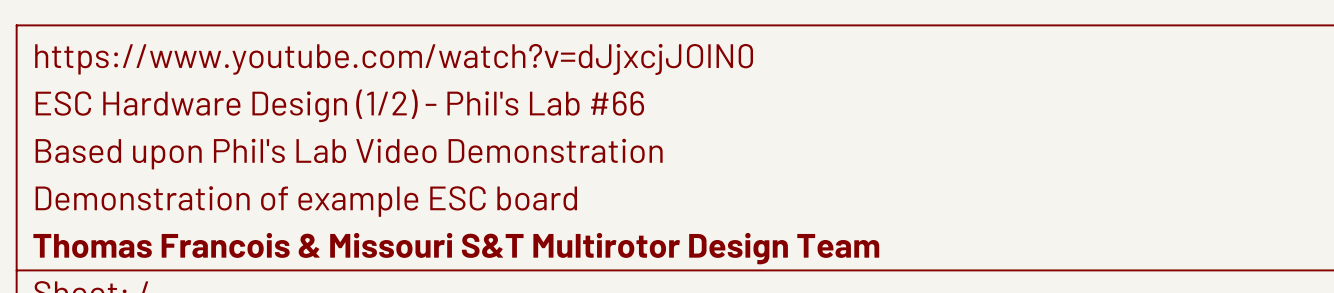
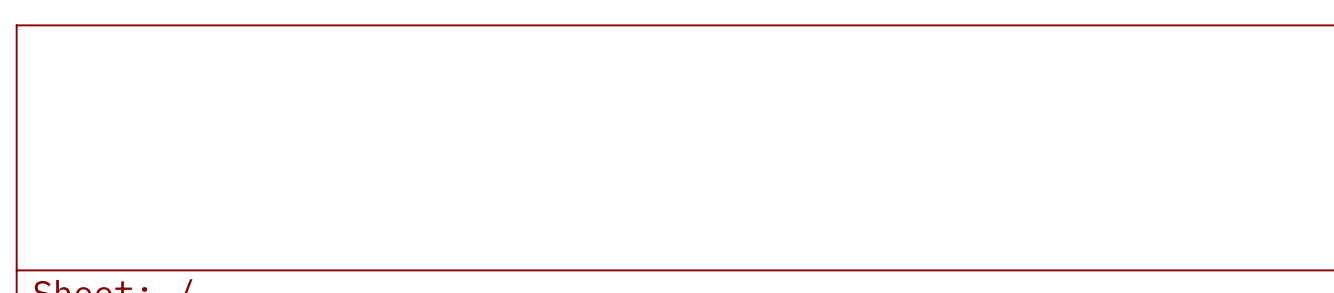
title block: https://www.youtube.com/watch?v=dJjxcjJOlN0 (394, 59) -> none
title block: ESC Hardware Design (1/2) - Phil's Lab #66 (339, 105) -> none
title block: Based upon Phil's Lab Video Demonstration (349, 154) -> none
title block: Demonstration of example ESC board (306, 201) -> none
title block: Thomas Francois & Missouri S&T Multirotor Design Team (456, 248) -> none

